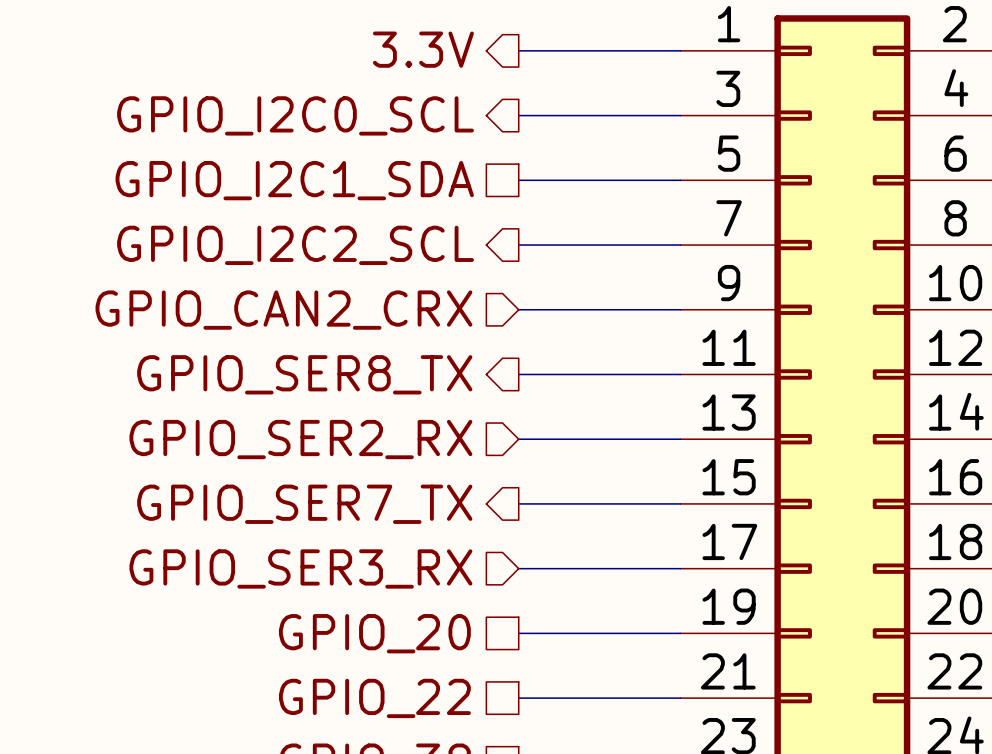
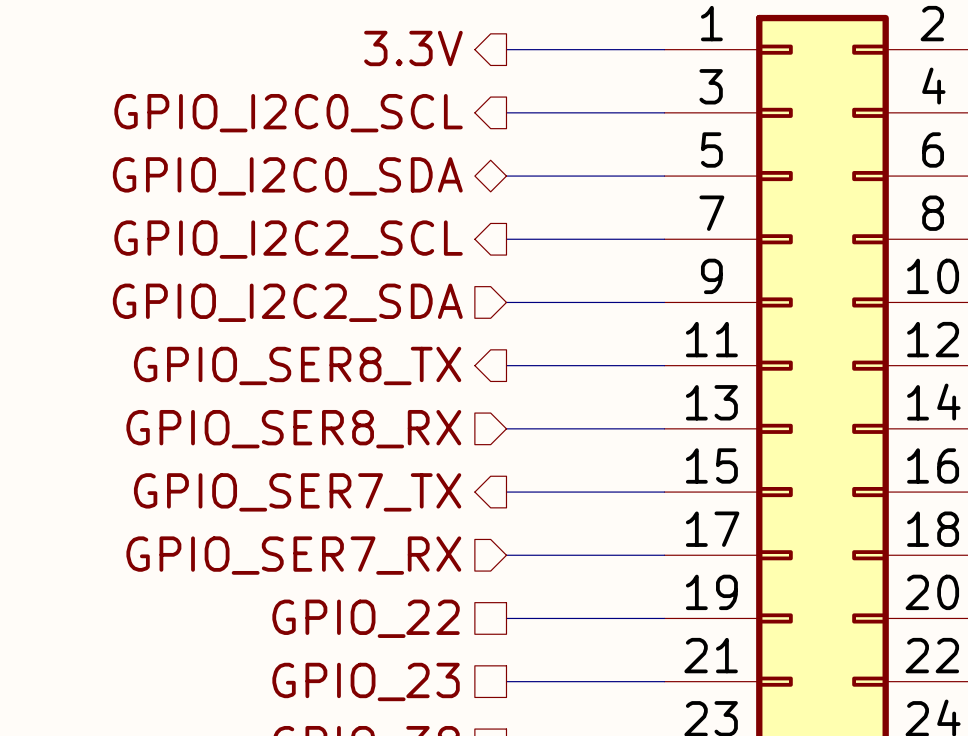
hierarchical label shape: passive (294, 180) -> bidirectional (287, 176)
hierarchical label: GPIO_I2C1_SDA (294, 180) -> GPIO_I2C0_SDA (287, 176)
hierarchical label: GPIO_CAN2_CRX (283, 310) -> GPIO_I2C2_SDA (287, 302)
hierarchical label: GPIO_SER2_RX (300, 439) -> GPIO_SER8_RX (293, 429)
hierarchical label: GPIO_SER3_RX (300, 568) -> GPIO_SER7_RX (293, 555)
hierarchical label: GPIO_20 (374, 633) -> GPIO_22 (366, 618)
hierarchical label: GPIO_22 (374, 698) -> GPIO_23 (366, 681)

